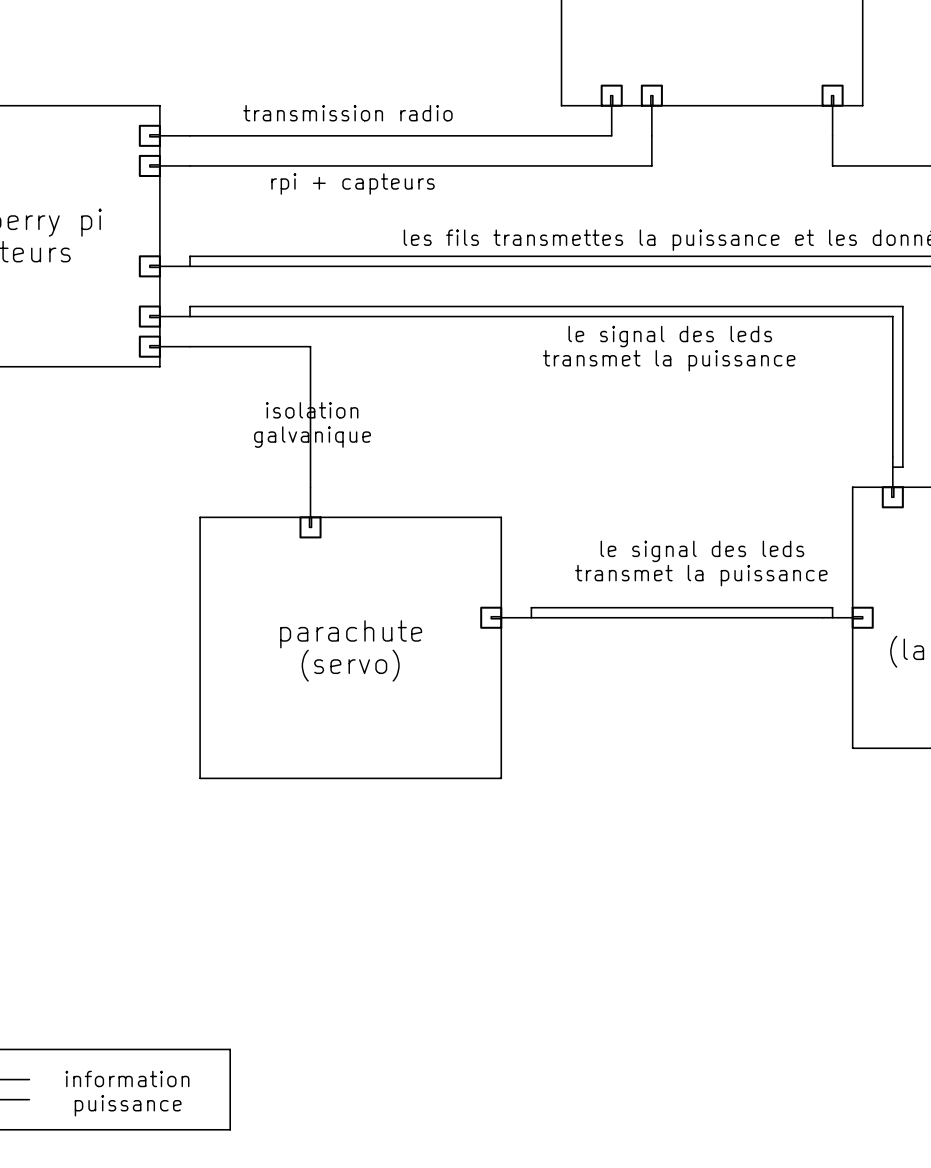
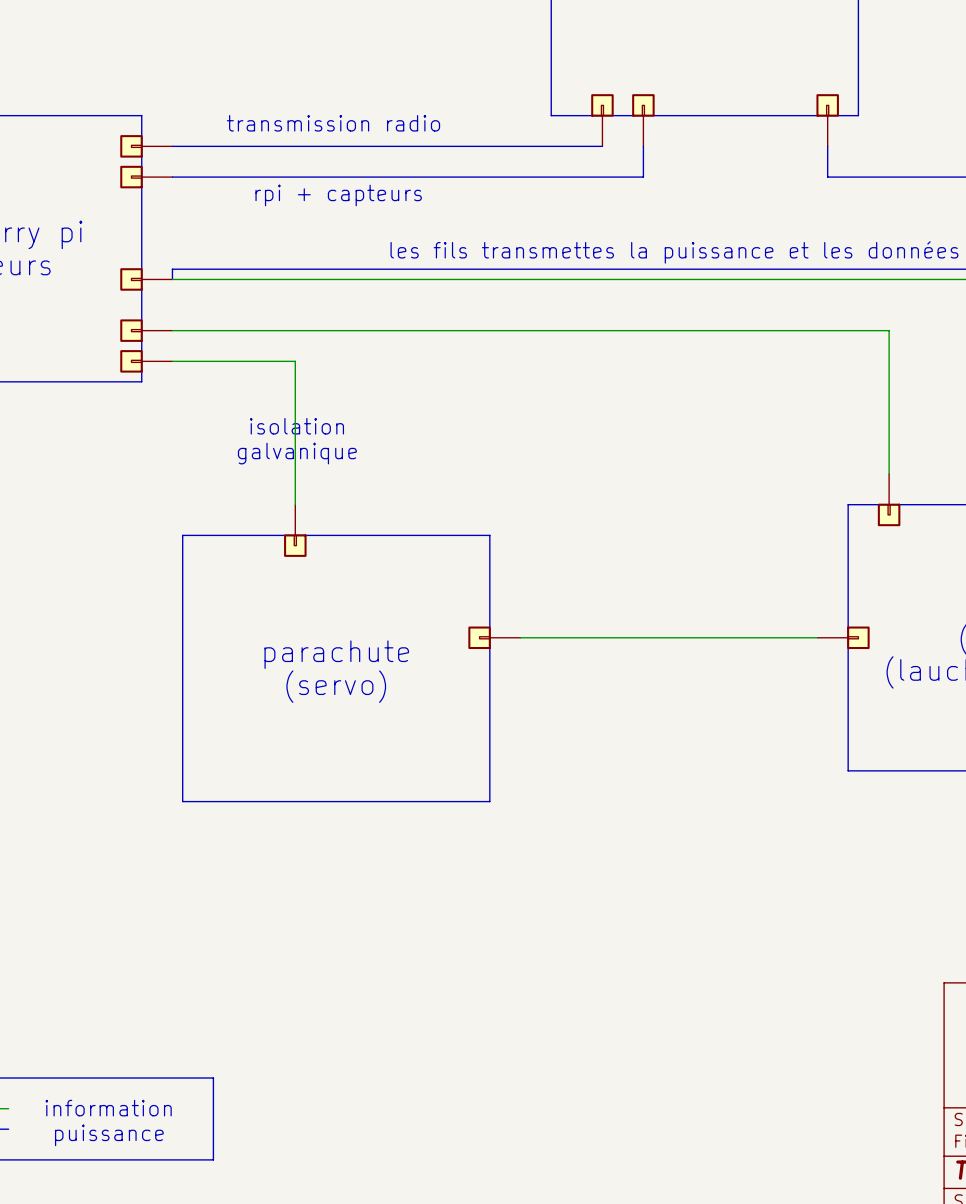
bus: (190, 316) (190, 306) (902, 306) (902, 467) (892, 467) -> none
text: le signal des leds (670, 336) -> none
text: transmet la puissance (669, 360) -> none
text: le signal des leds (702, 551) -> none
text: transmet la puissance (701, 575) -> none
bus: (531, 617) (531, 607) (832, 607) (832, 617) -> none

